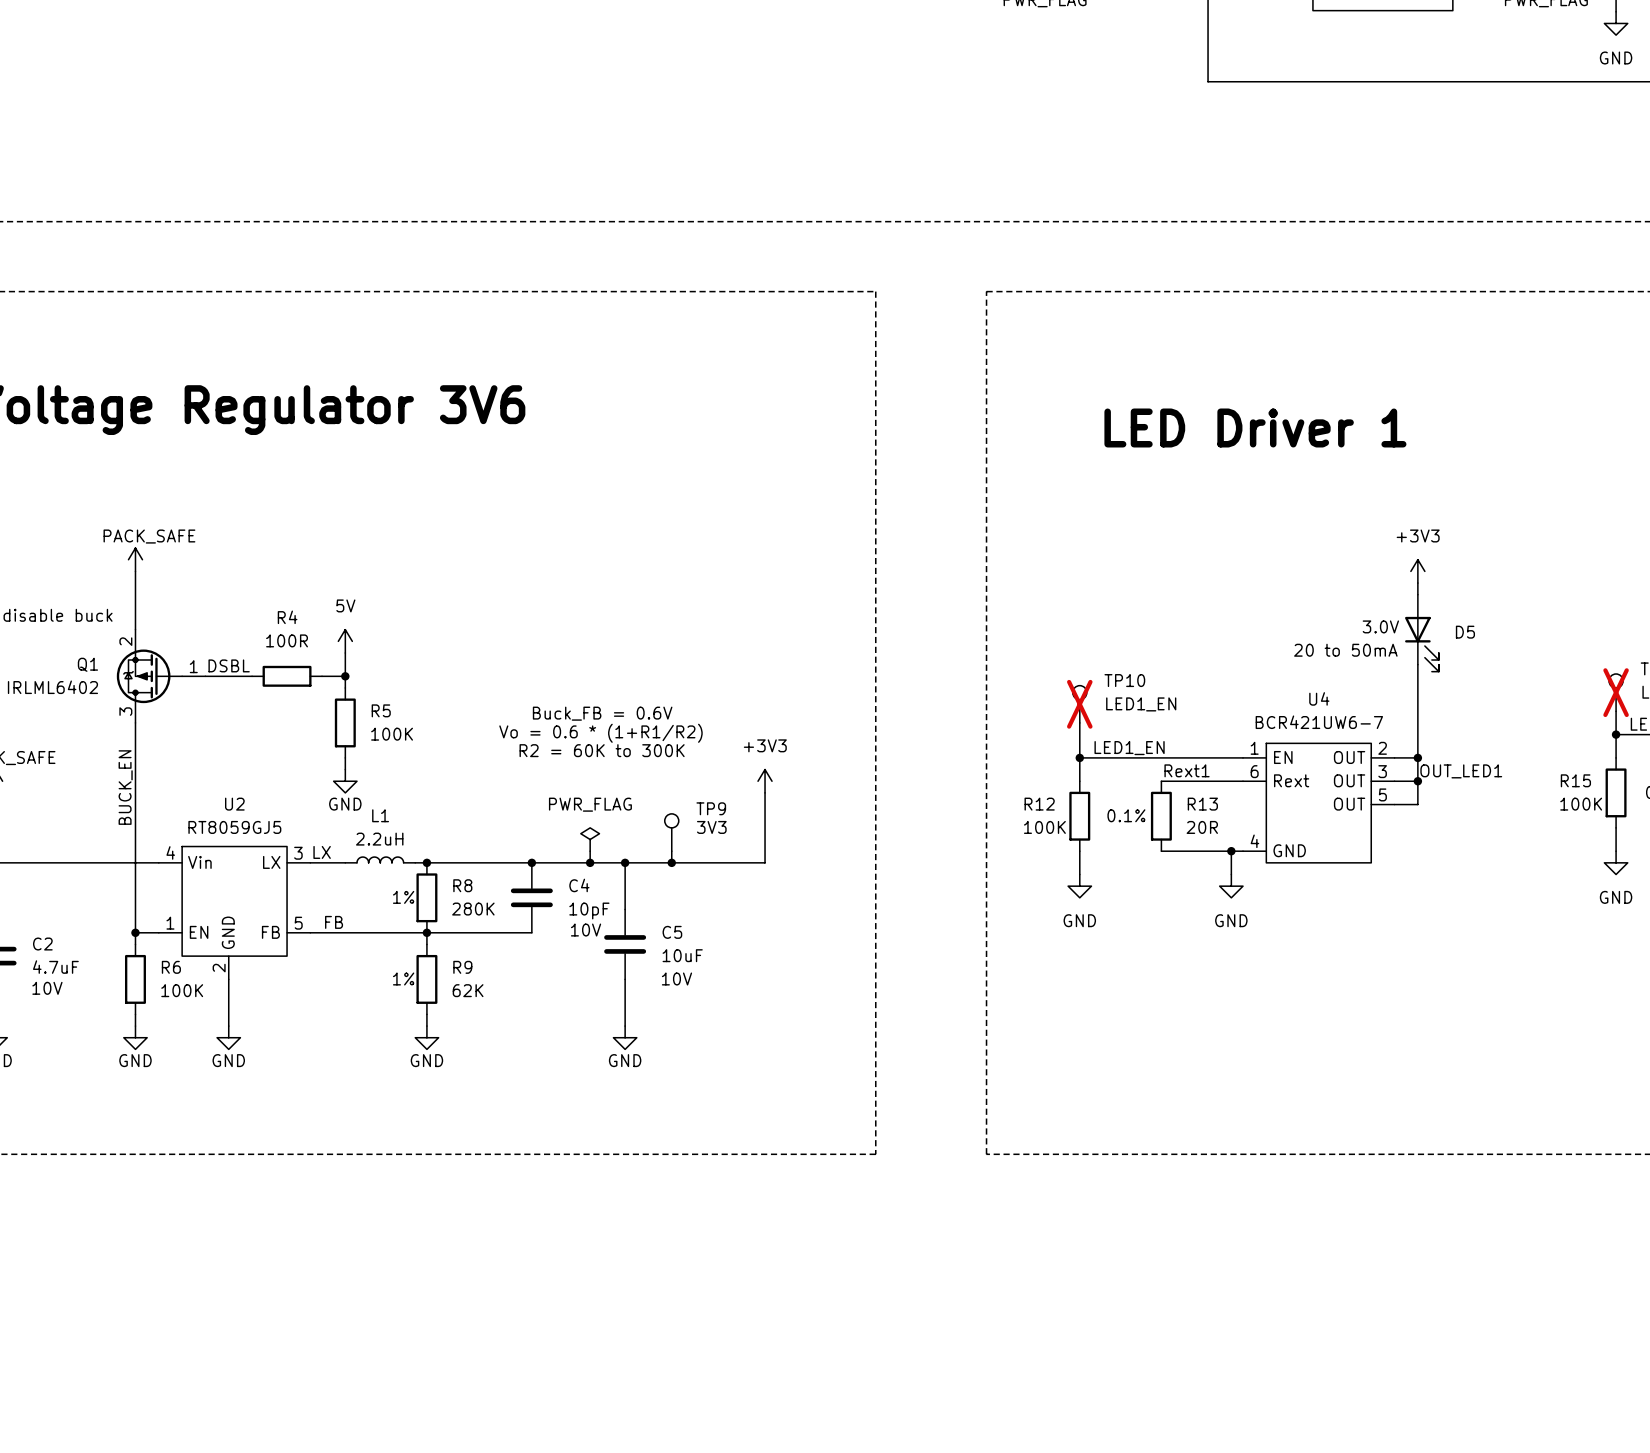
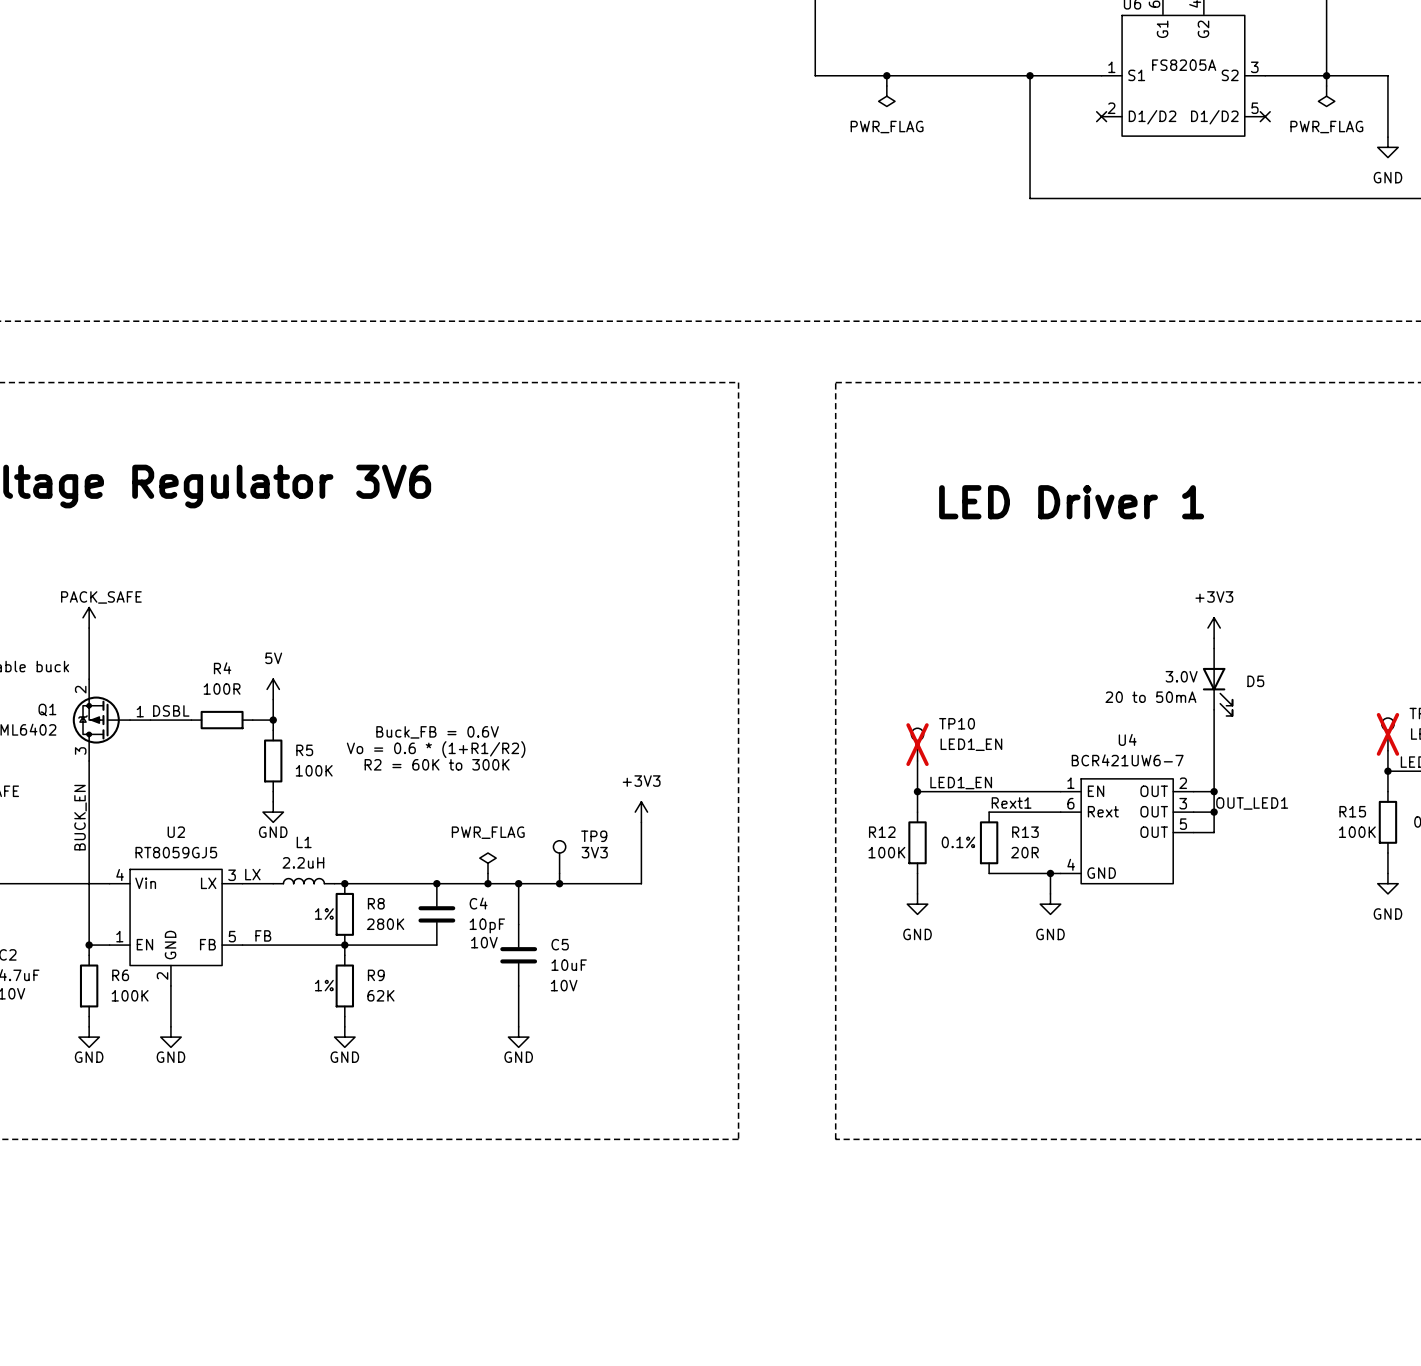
text position: Buck_FB = 0.6V (602, 713) -> Buck_FB = 0.6V (437, 732)
text position: Vo = 0.6 * (1+R1/R2) (600, 733) -> Vo = 0.6 * (1+R1/R2) (436, 749)
text position: R2 = 60K to 300K (602, 750) -> R2 = 60K to 300K (437, 764)

